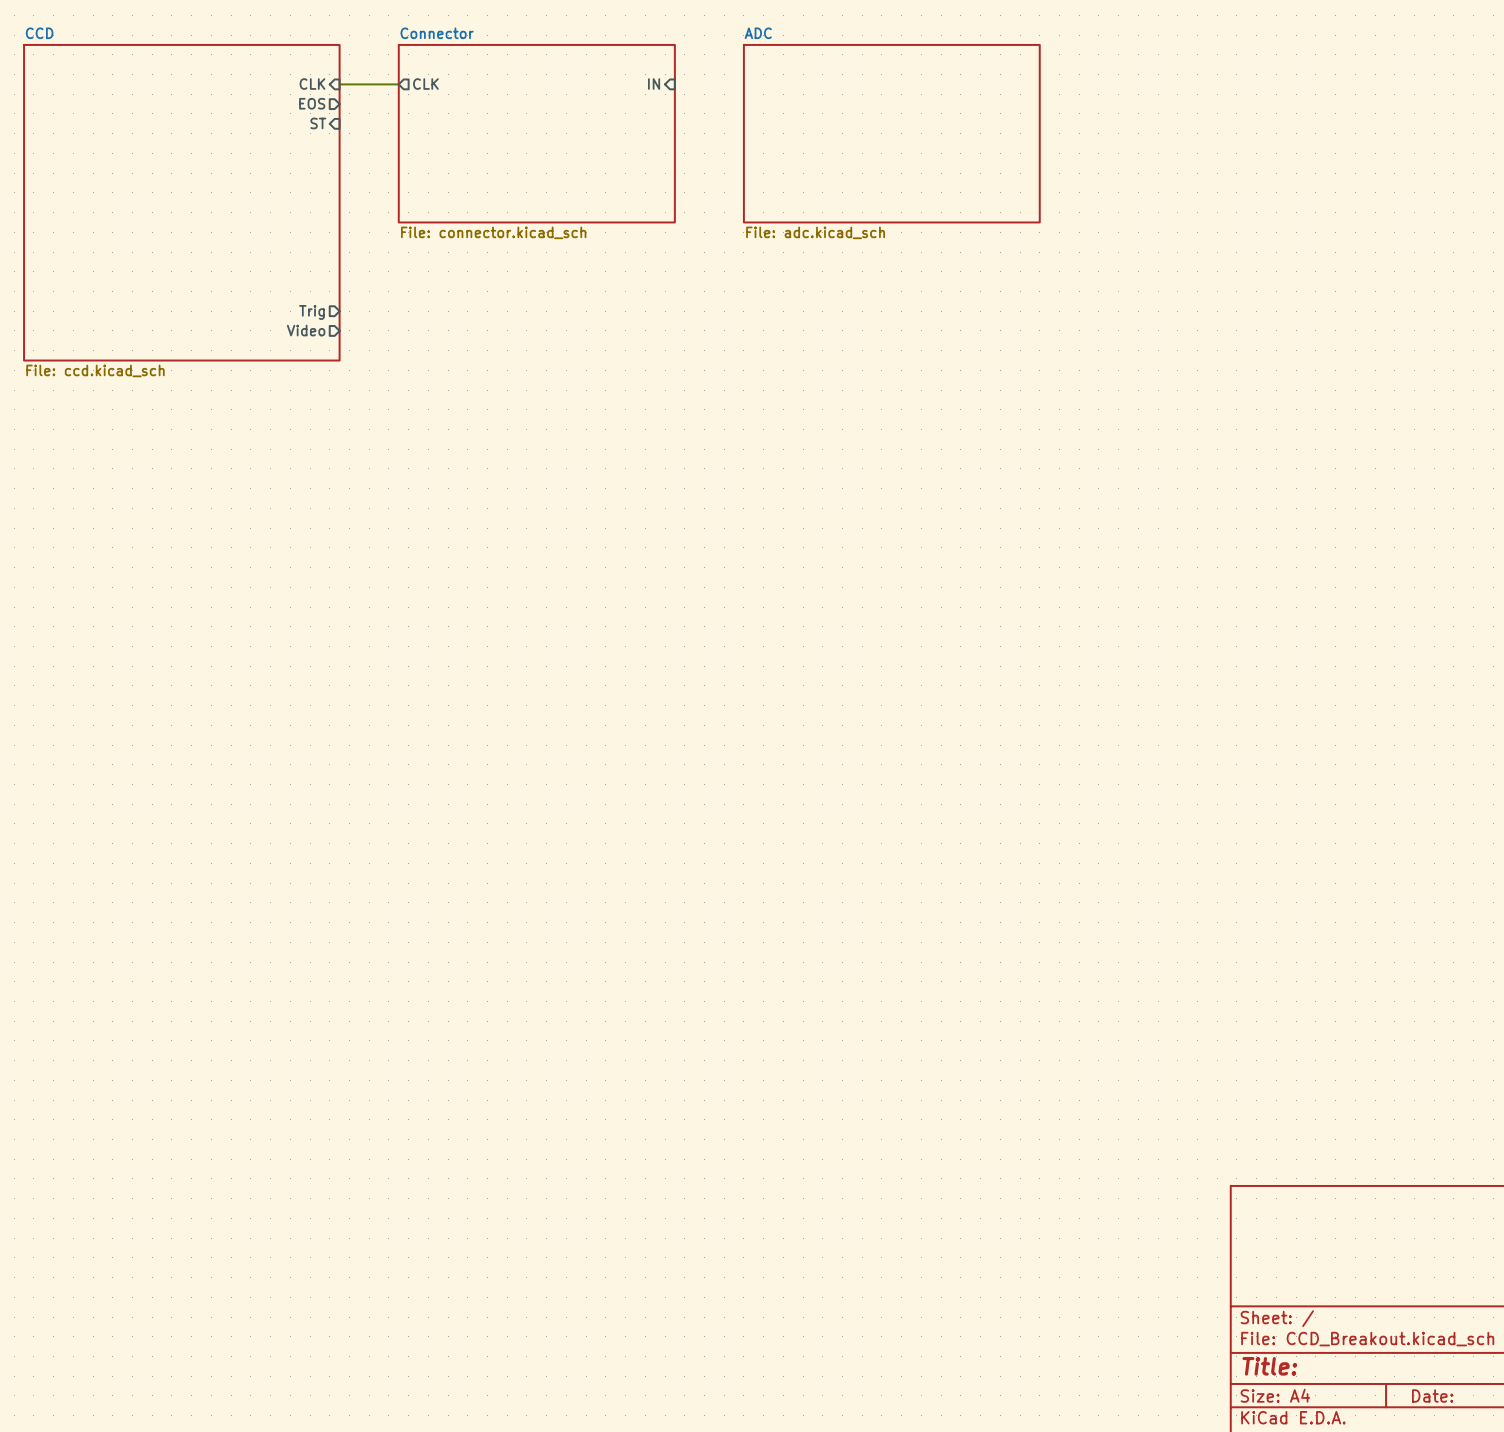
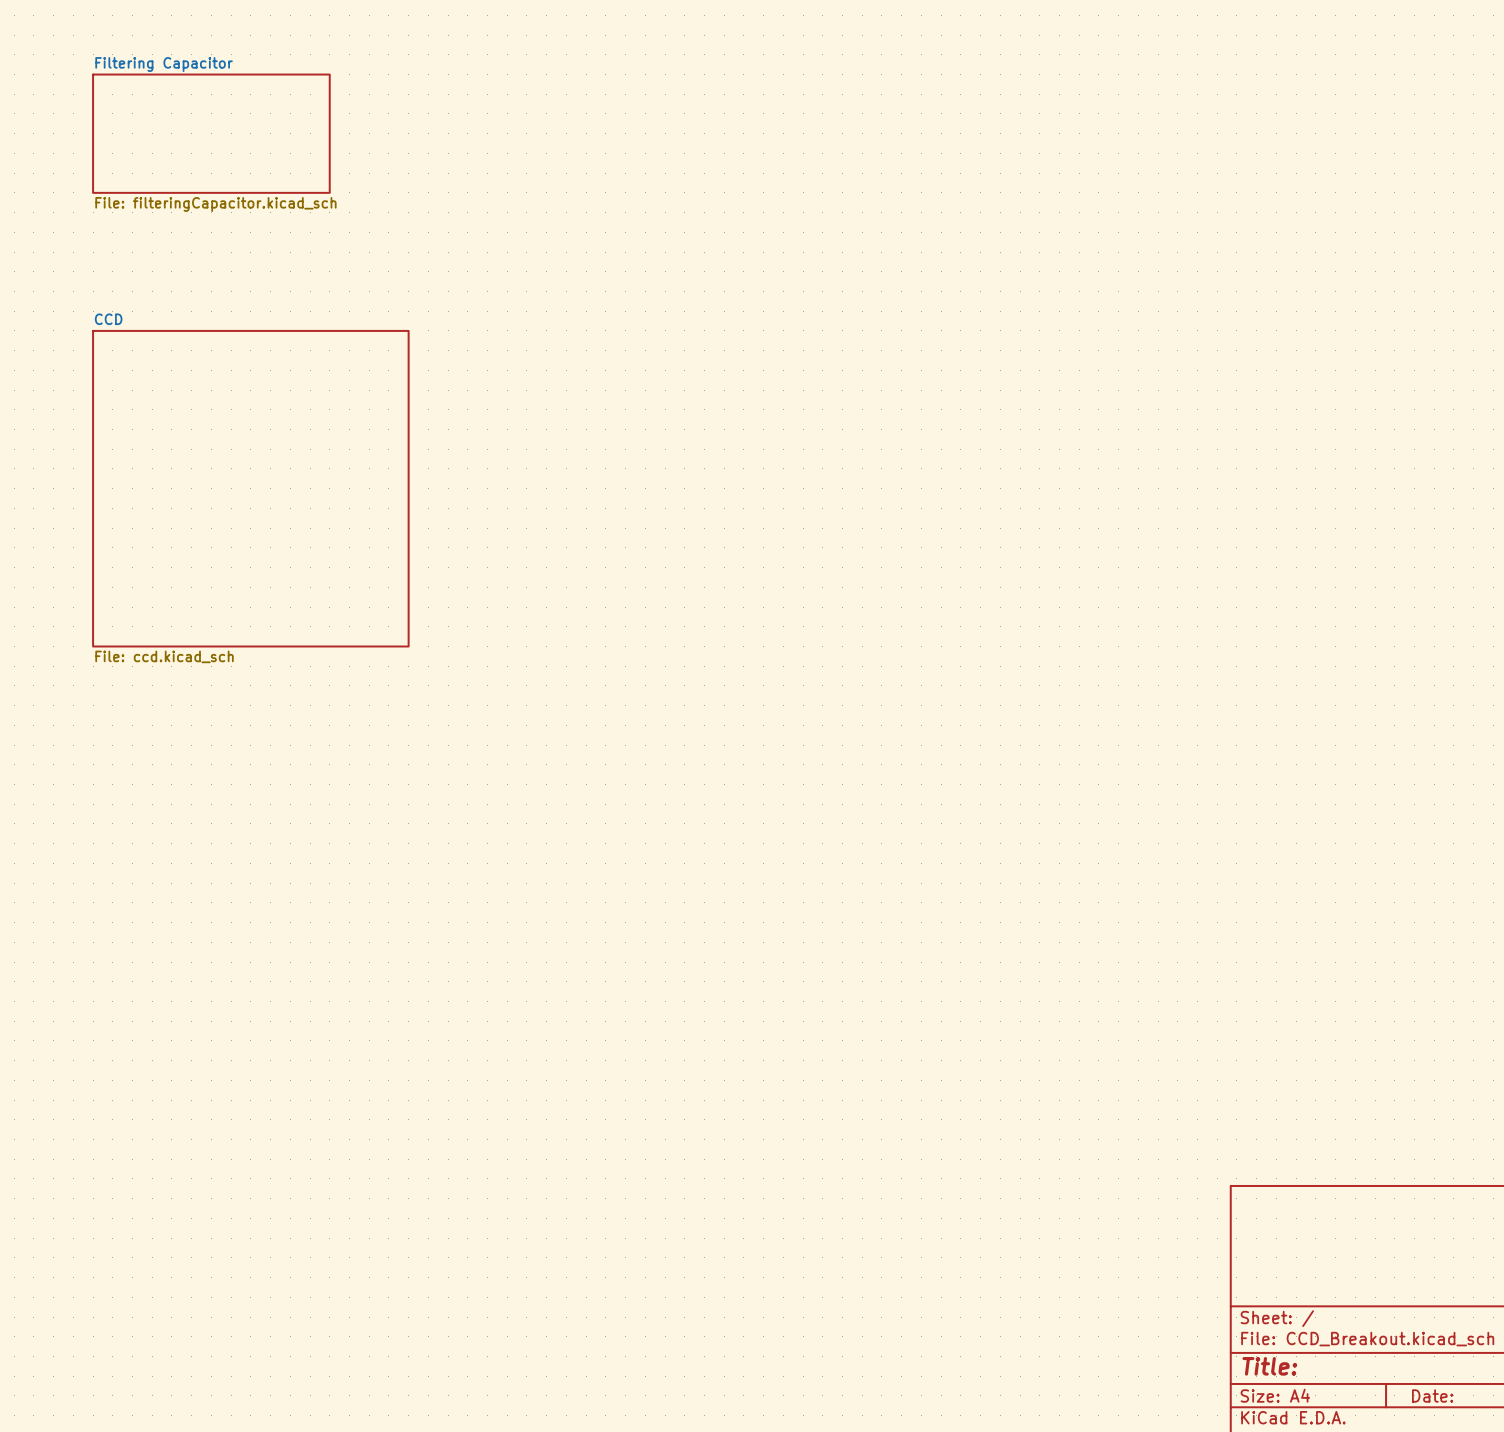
sheet pin: CLK (312, 84) -> none
wire: (339, 84) (398, 84) -> none
sheet pin: CLK (425, 84) -> none
sheet pin: IN (654, 84) -> none
sheet pin: EOS (312, 103) -> none
sheet pin: ST (318, 123) -> none
sheet Filtering Capacitor: none -> File: filteringCapacitor.kicad_sch (211, 133)
sheet Connector: File: connector.kicad_sch (536, 133) -> none
sheet ADC: File: adc.kicad_sch (891, 133) -> none
sheet CCD: File: ccd.kicad_sch (181, 202) -> none
sheet pin: Trig (311, 312) -> none
sheet pin: Video (306, 330) -> none
sheet CCD: none -> File: ccd.kicad_sch (250, 488)

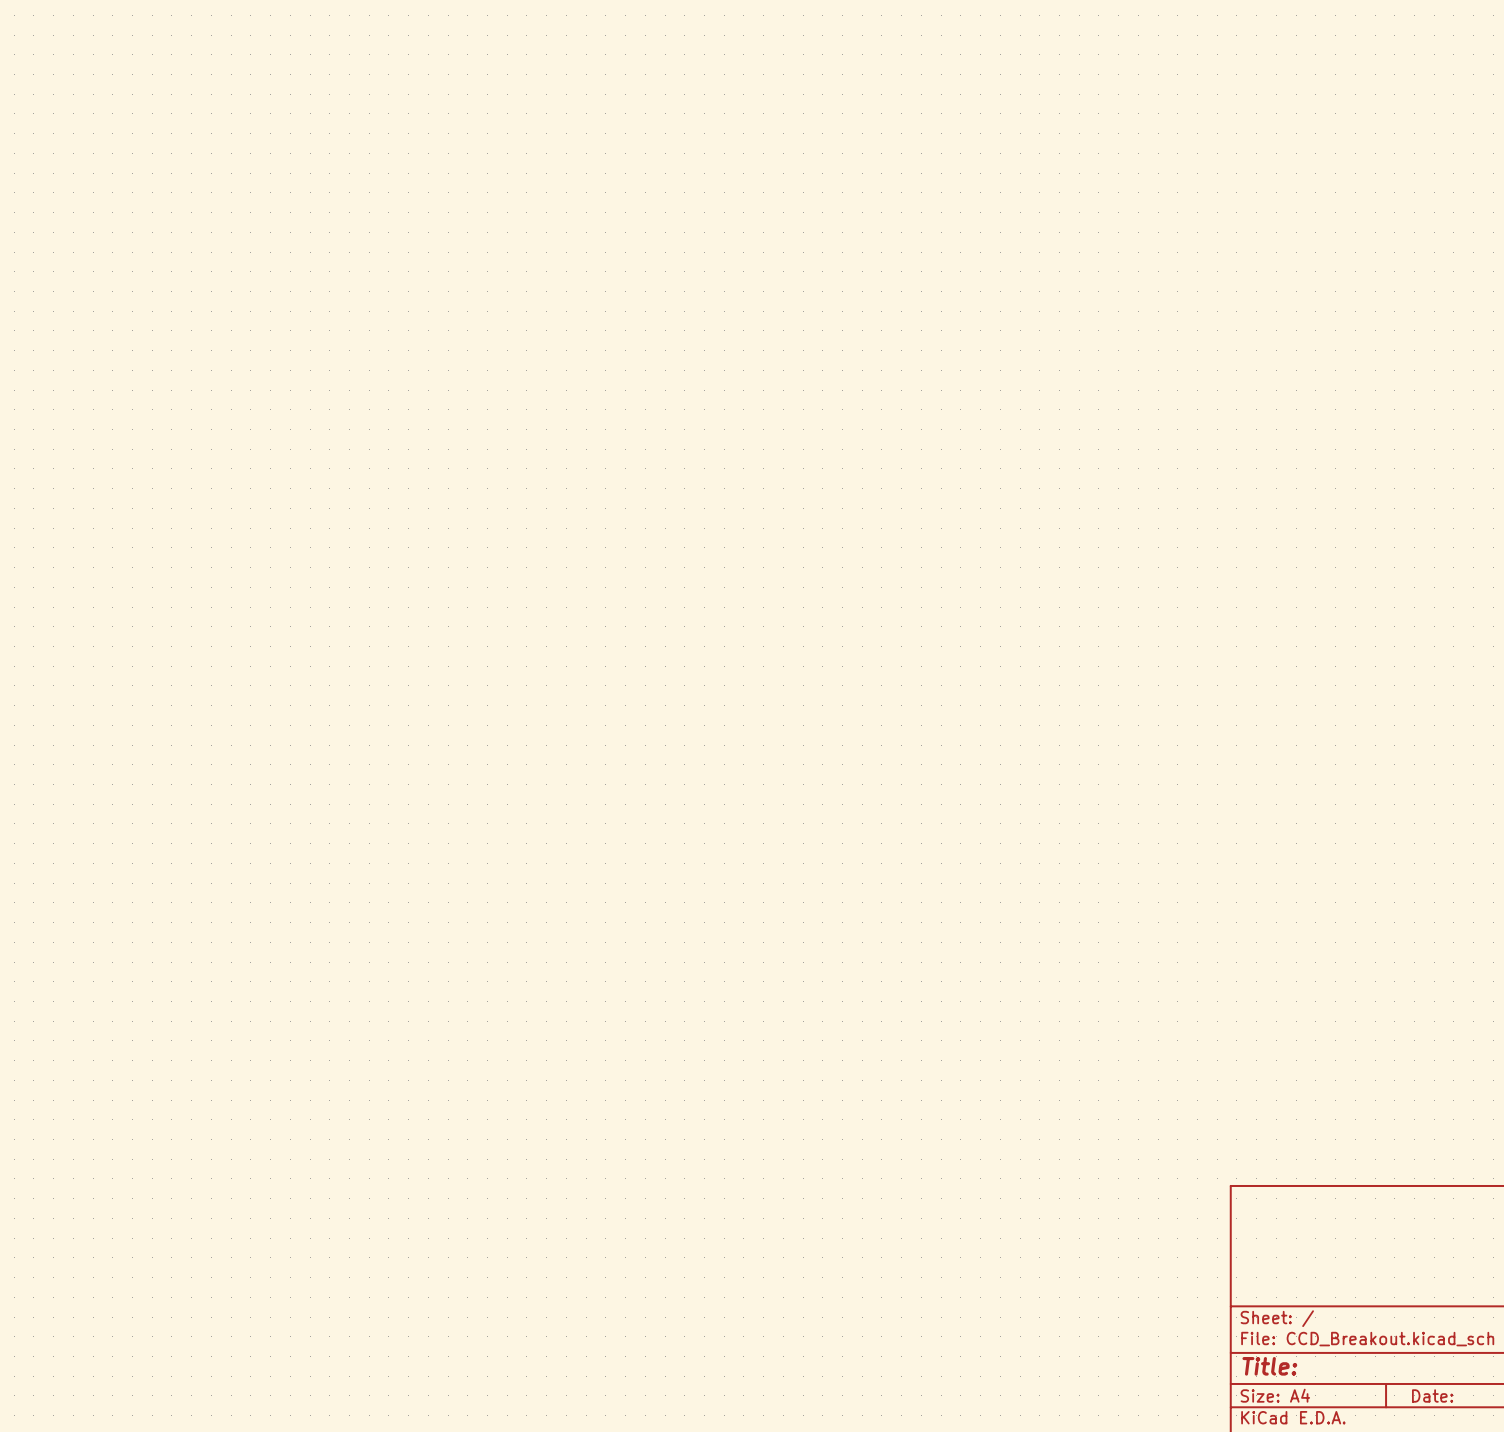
sheet Filtering Capacitor: File: filteringCapacitor.kicad_sch (211, 133) -> none
sheet CCD: File: ccd.kicad_sch (250, 488) -> none

